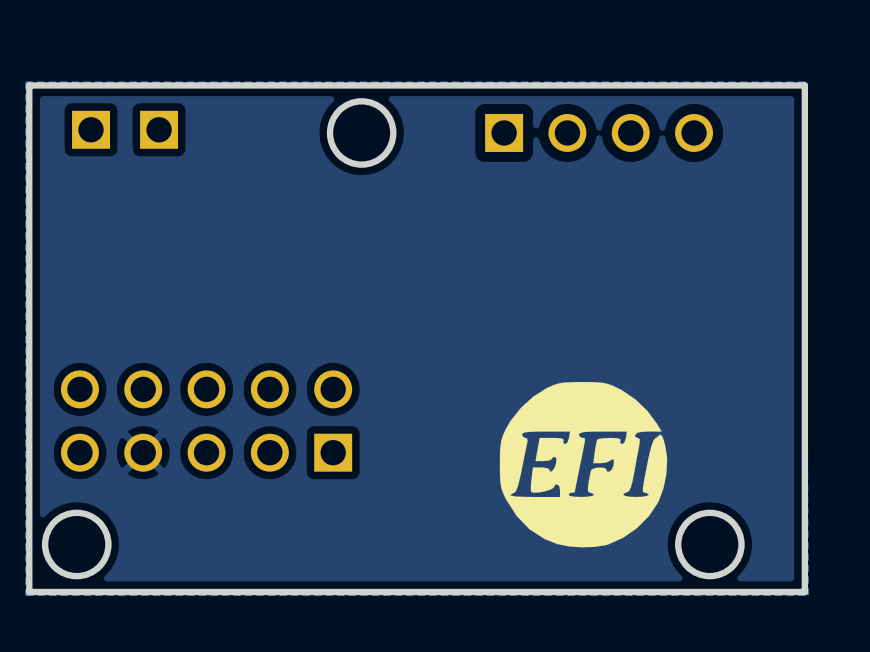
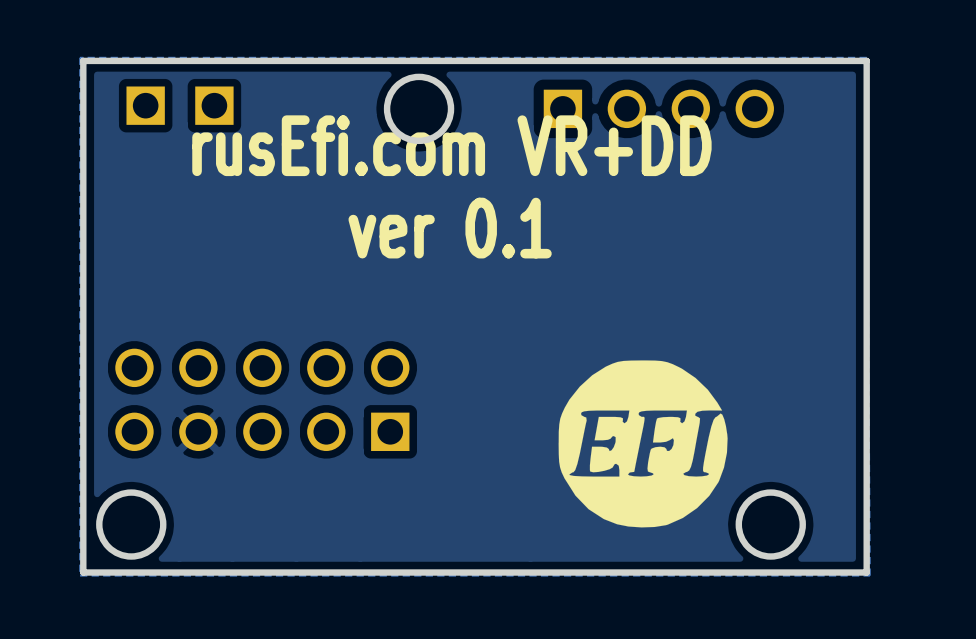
text: none -> rusEfi.com VR+DD (451, 145)
text: none -> ver 0.1 (450, 228)

